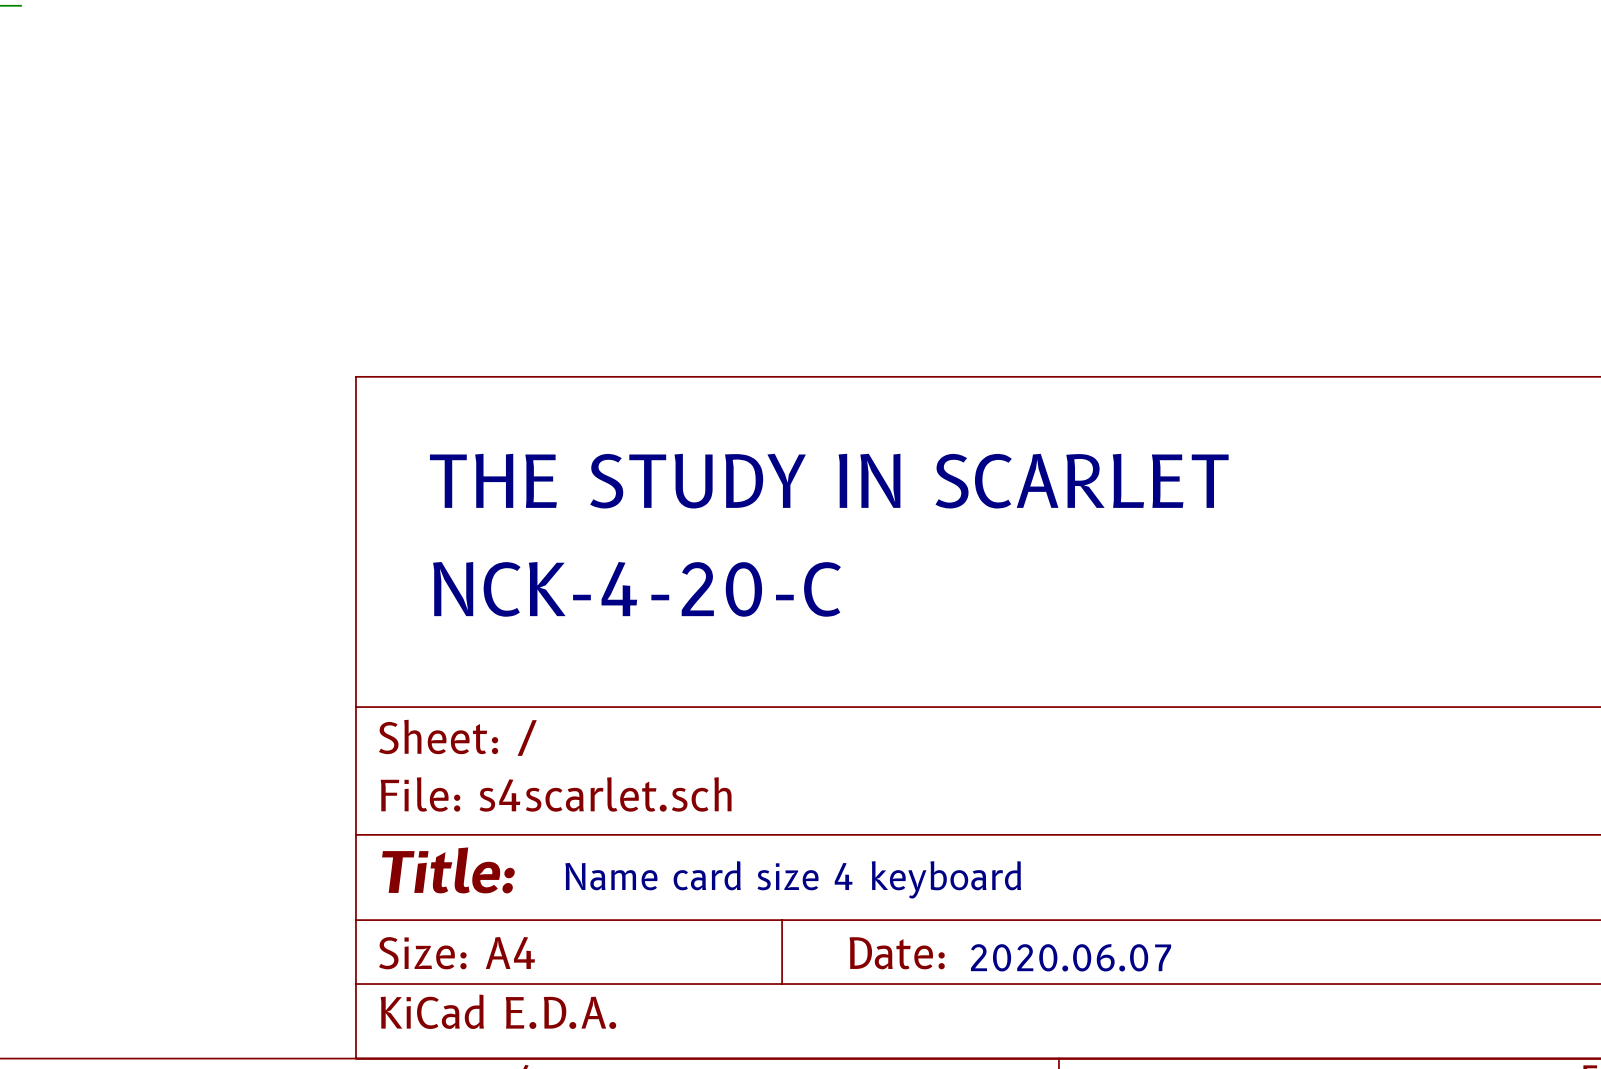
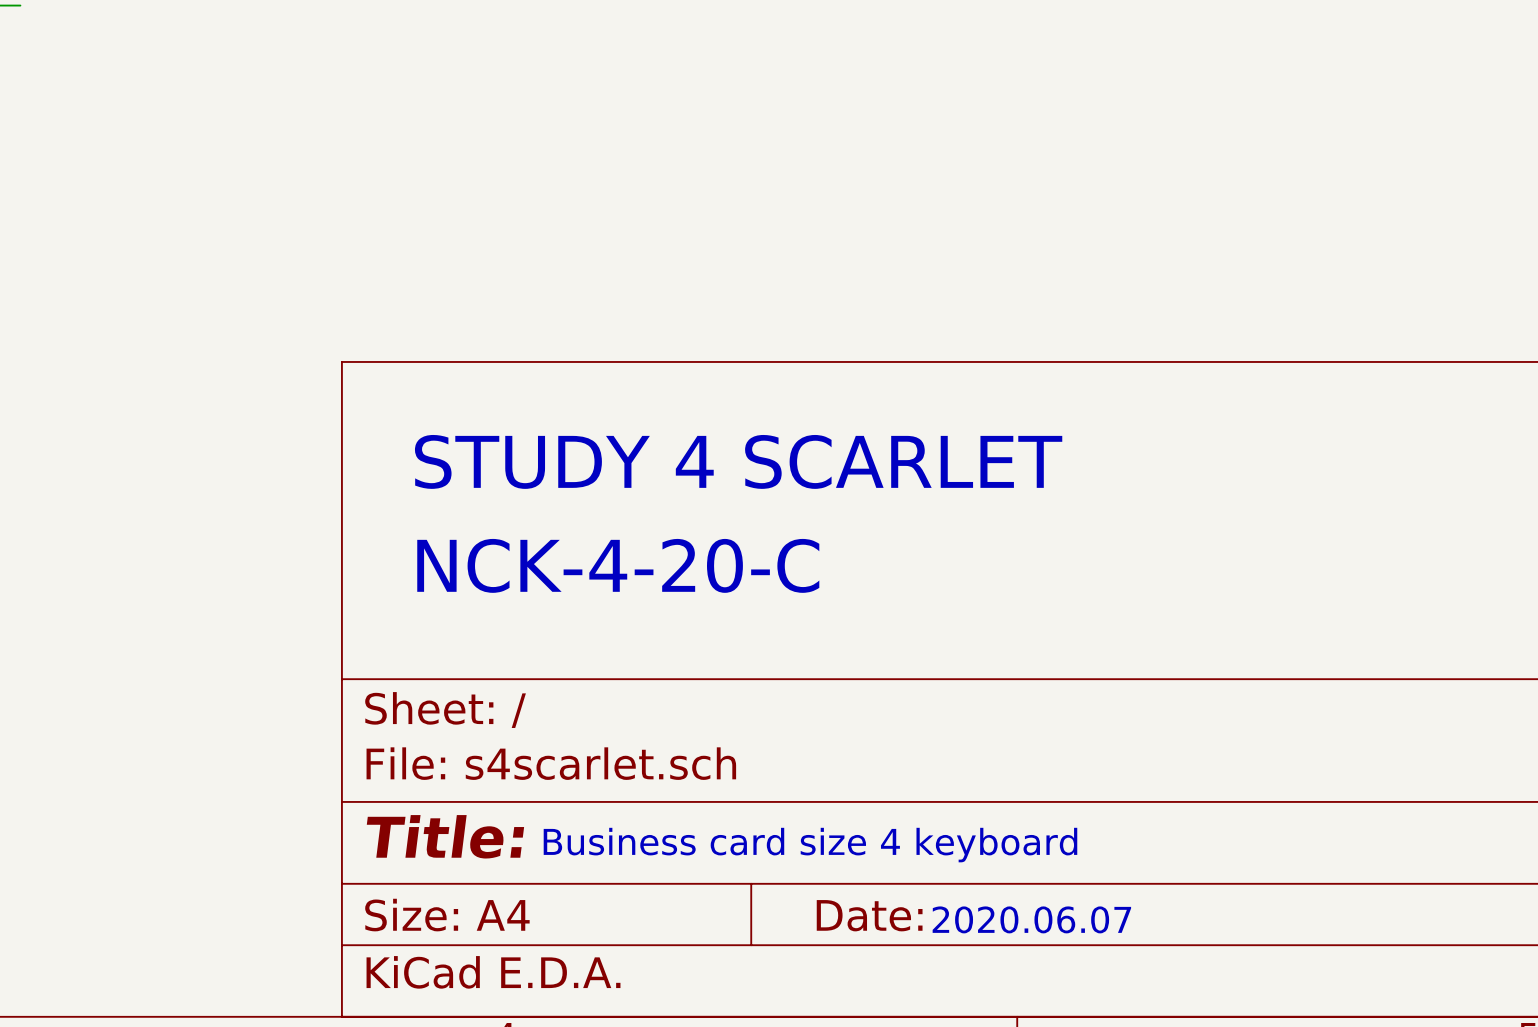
text: THE STUDY IN SCARLET (829, 481) -> STUDY 4 SCARLET (738, 461)
text: Name card size 4 keyboard (793, 879) -> Business card size 4 keyboard (810, 845)

